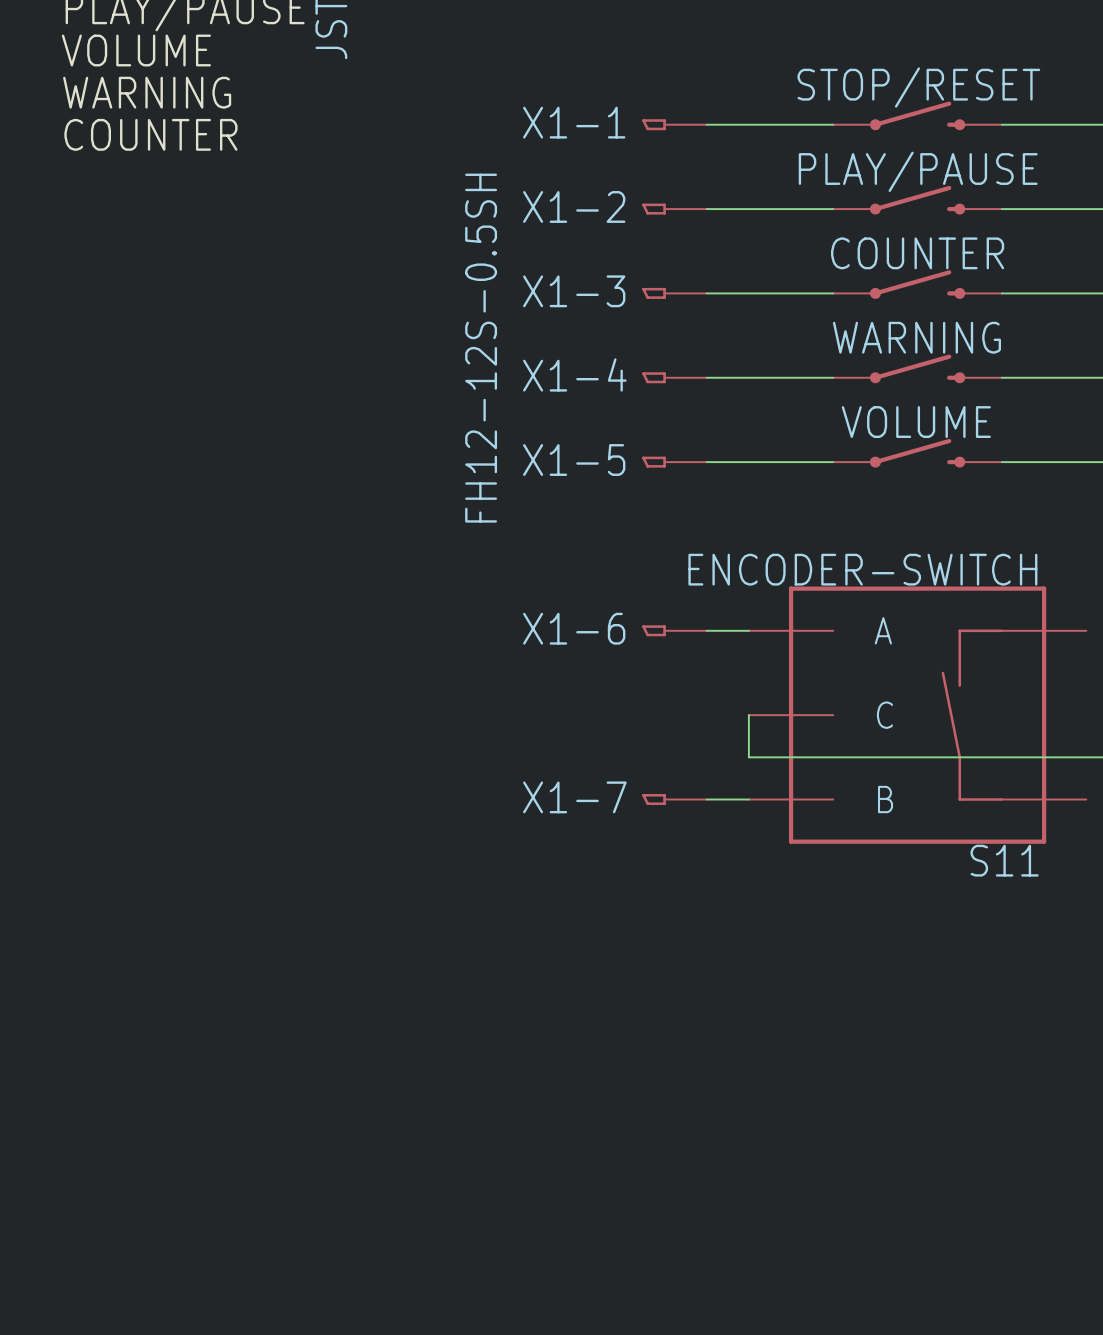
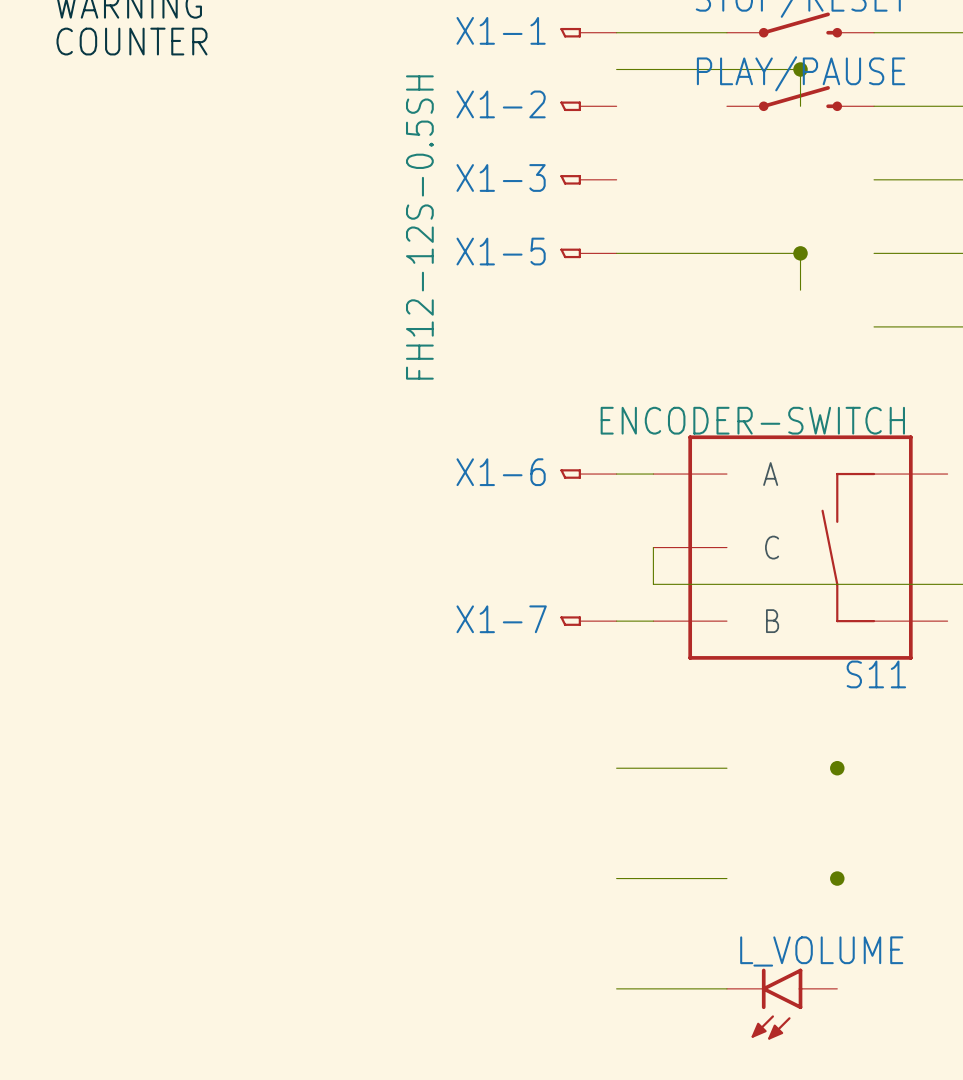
wire: none -> (616, 69) (800, 69) (800, 106)
junction: none -> (800, 69)
wire: (706, 209) (833, 209) -> none
COUNTER: (917, 284) -> none
wire: (706, 293) (833, 293) -> none
WARNING: (917, 368) -> none
X1-4 name: X1-4 (574, 374) -> X1-5 (501, 251)
wire: none -> (726, 253) (800, 253) (800, 290)
junction: none -> (800, 253)
VOLUME: (917, 453) -> none
X1-5: (674, 462) -> none
wire: (706, 462) (833, 462) -> none
wire: none -> (616, 768) (726, 768)
junction: none -> (837, 768)
wire: none -> (616, 878) (726, 878)
junction: none -> (837, 878)
wire: none -> (616, 988) (726, 988)
L_VOLUME: none -> (782, 1004)

